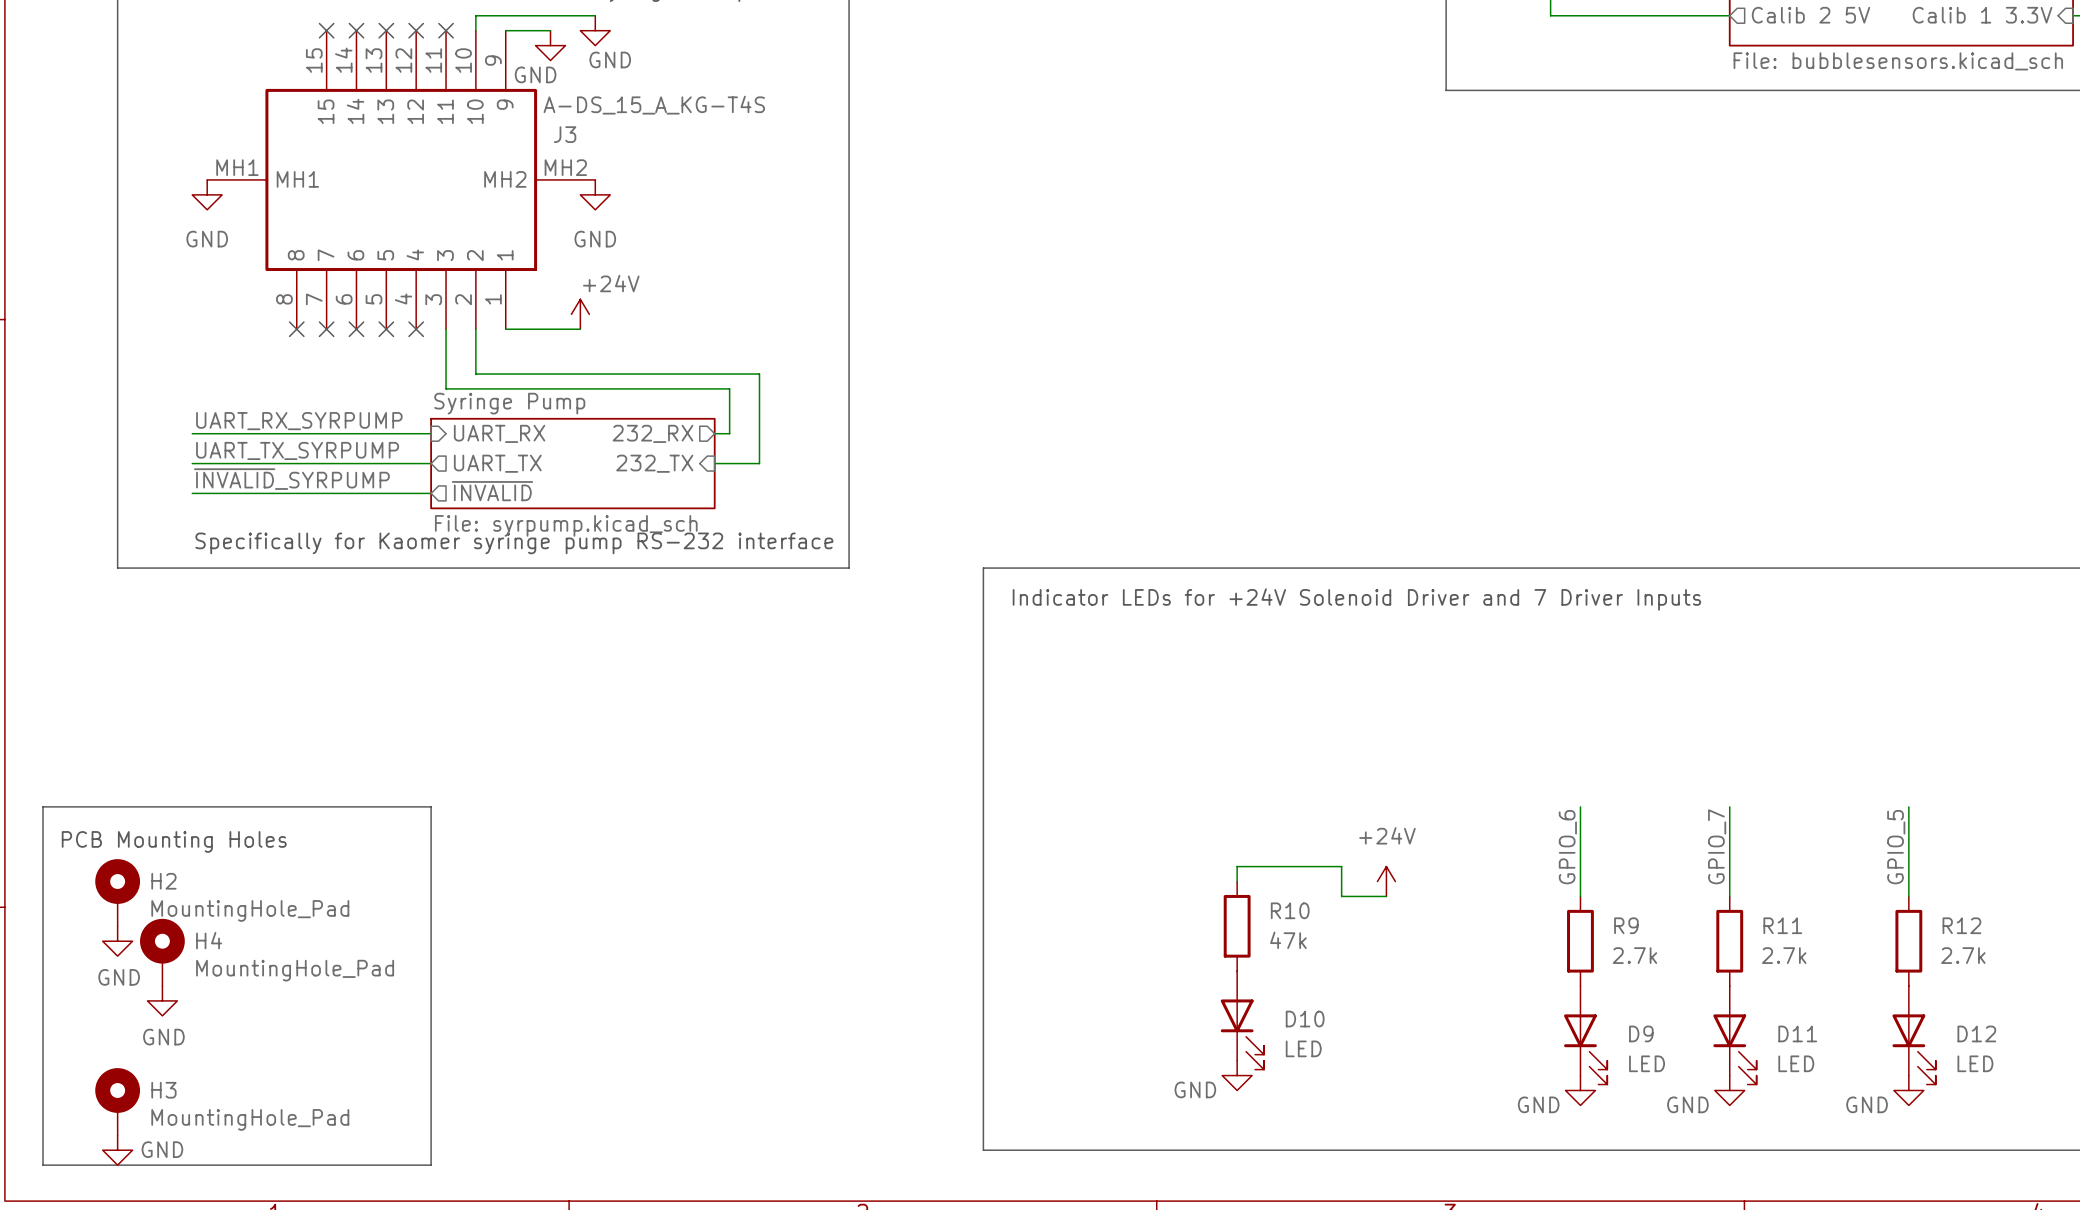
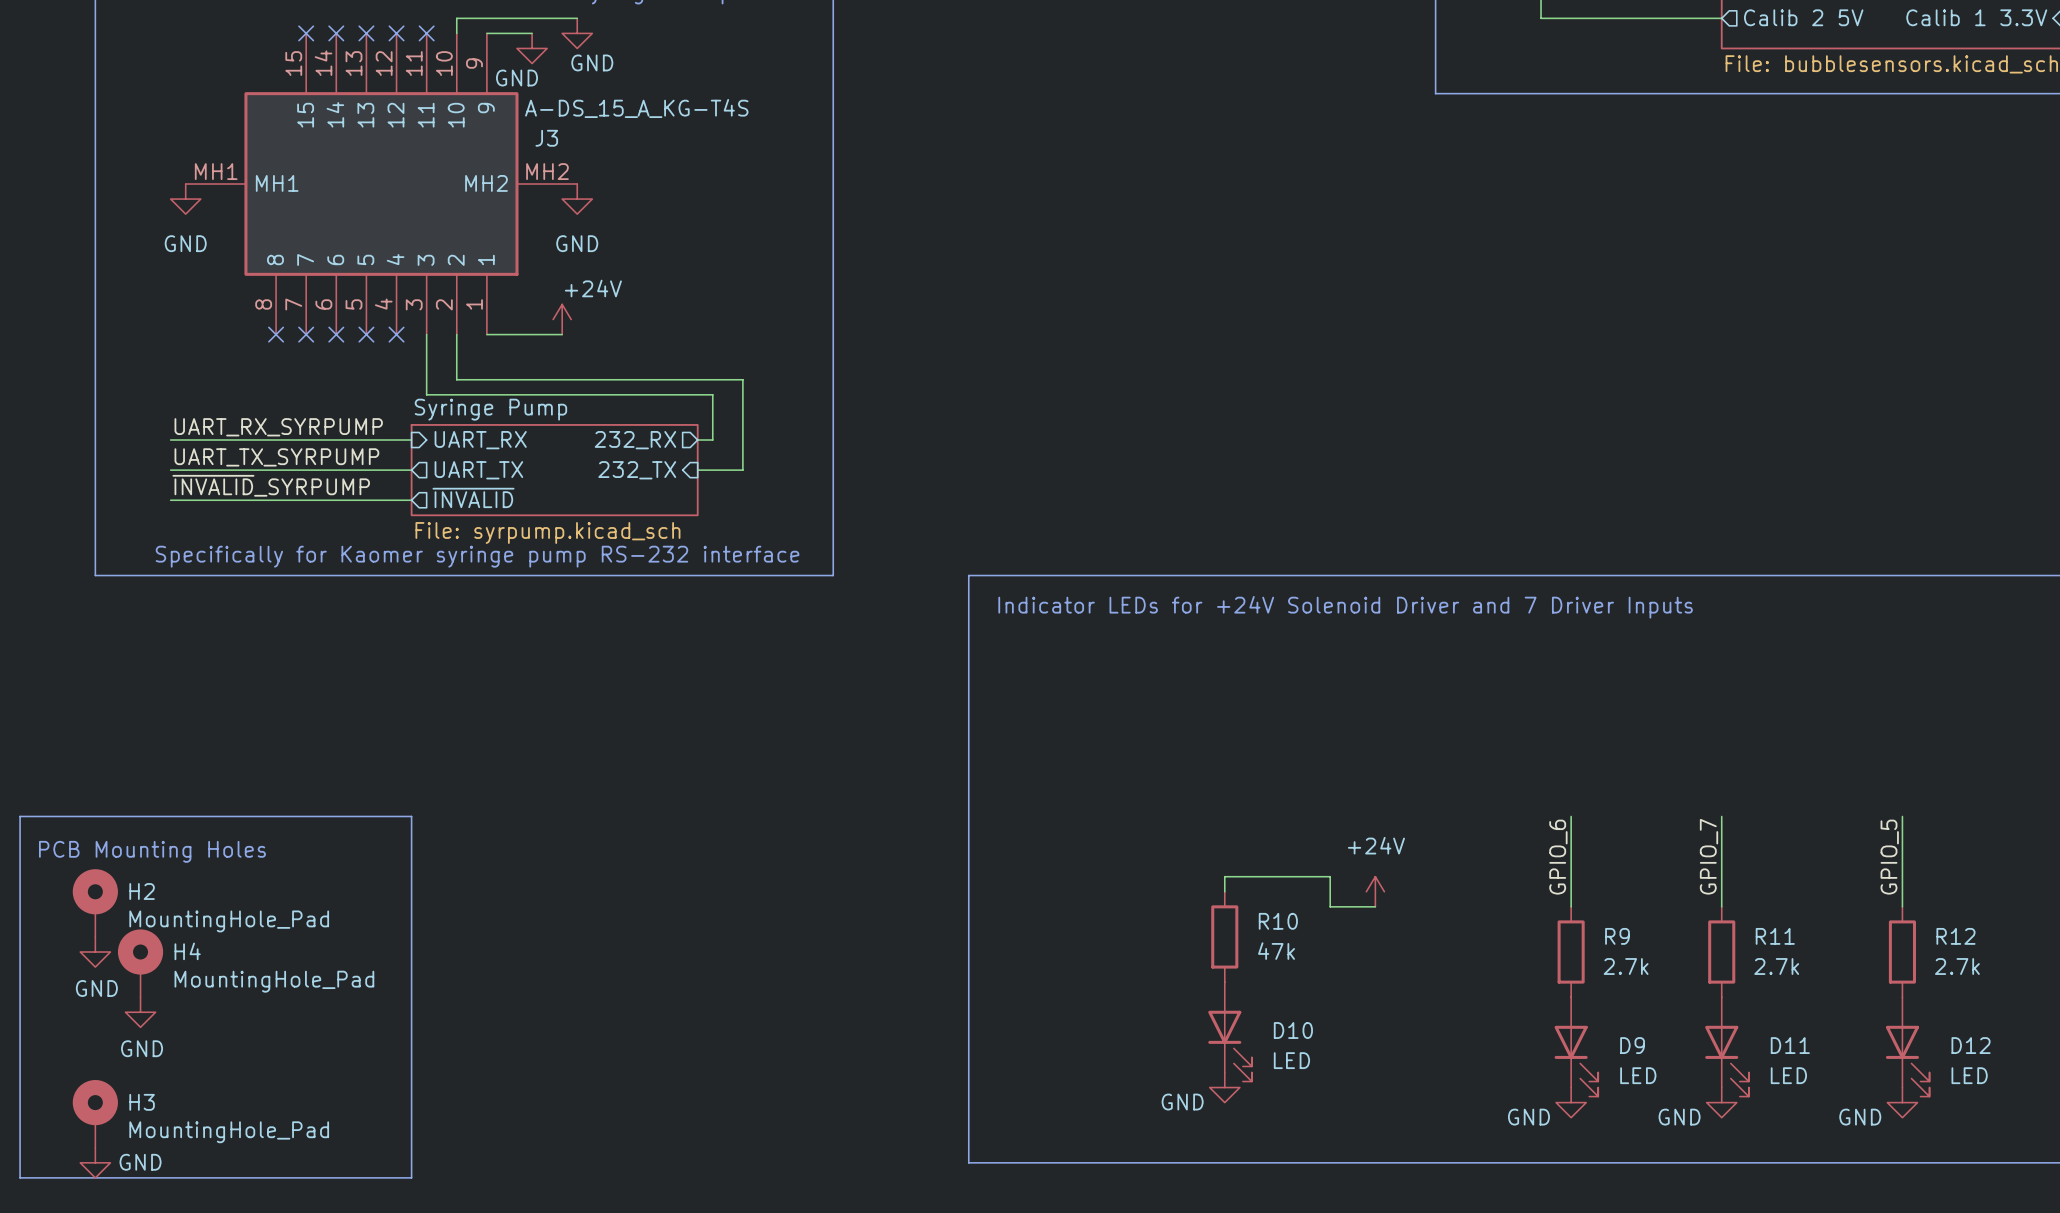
text position: Specifically for Kaomer syringe pump RS-232 interface (514, 543) -> Specifically for Kaomer syringe pump RS-232 interface (477, 556)

